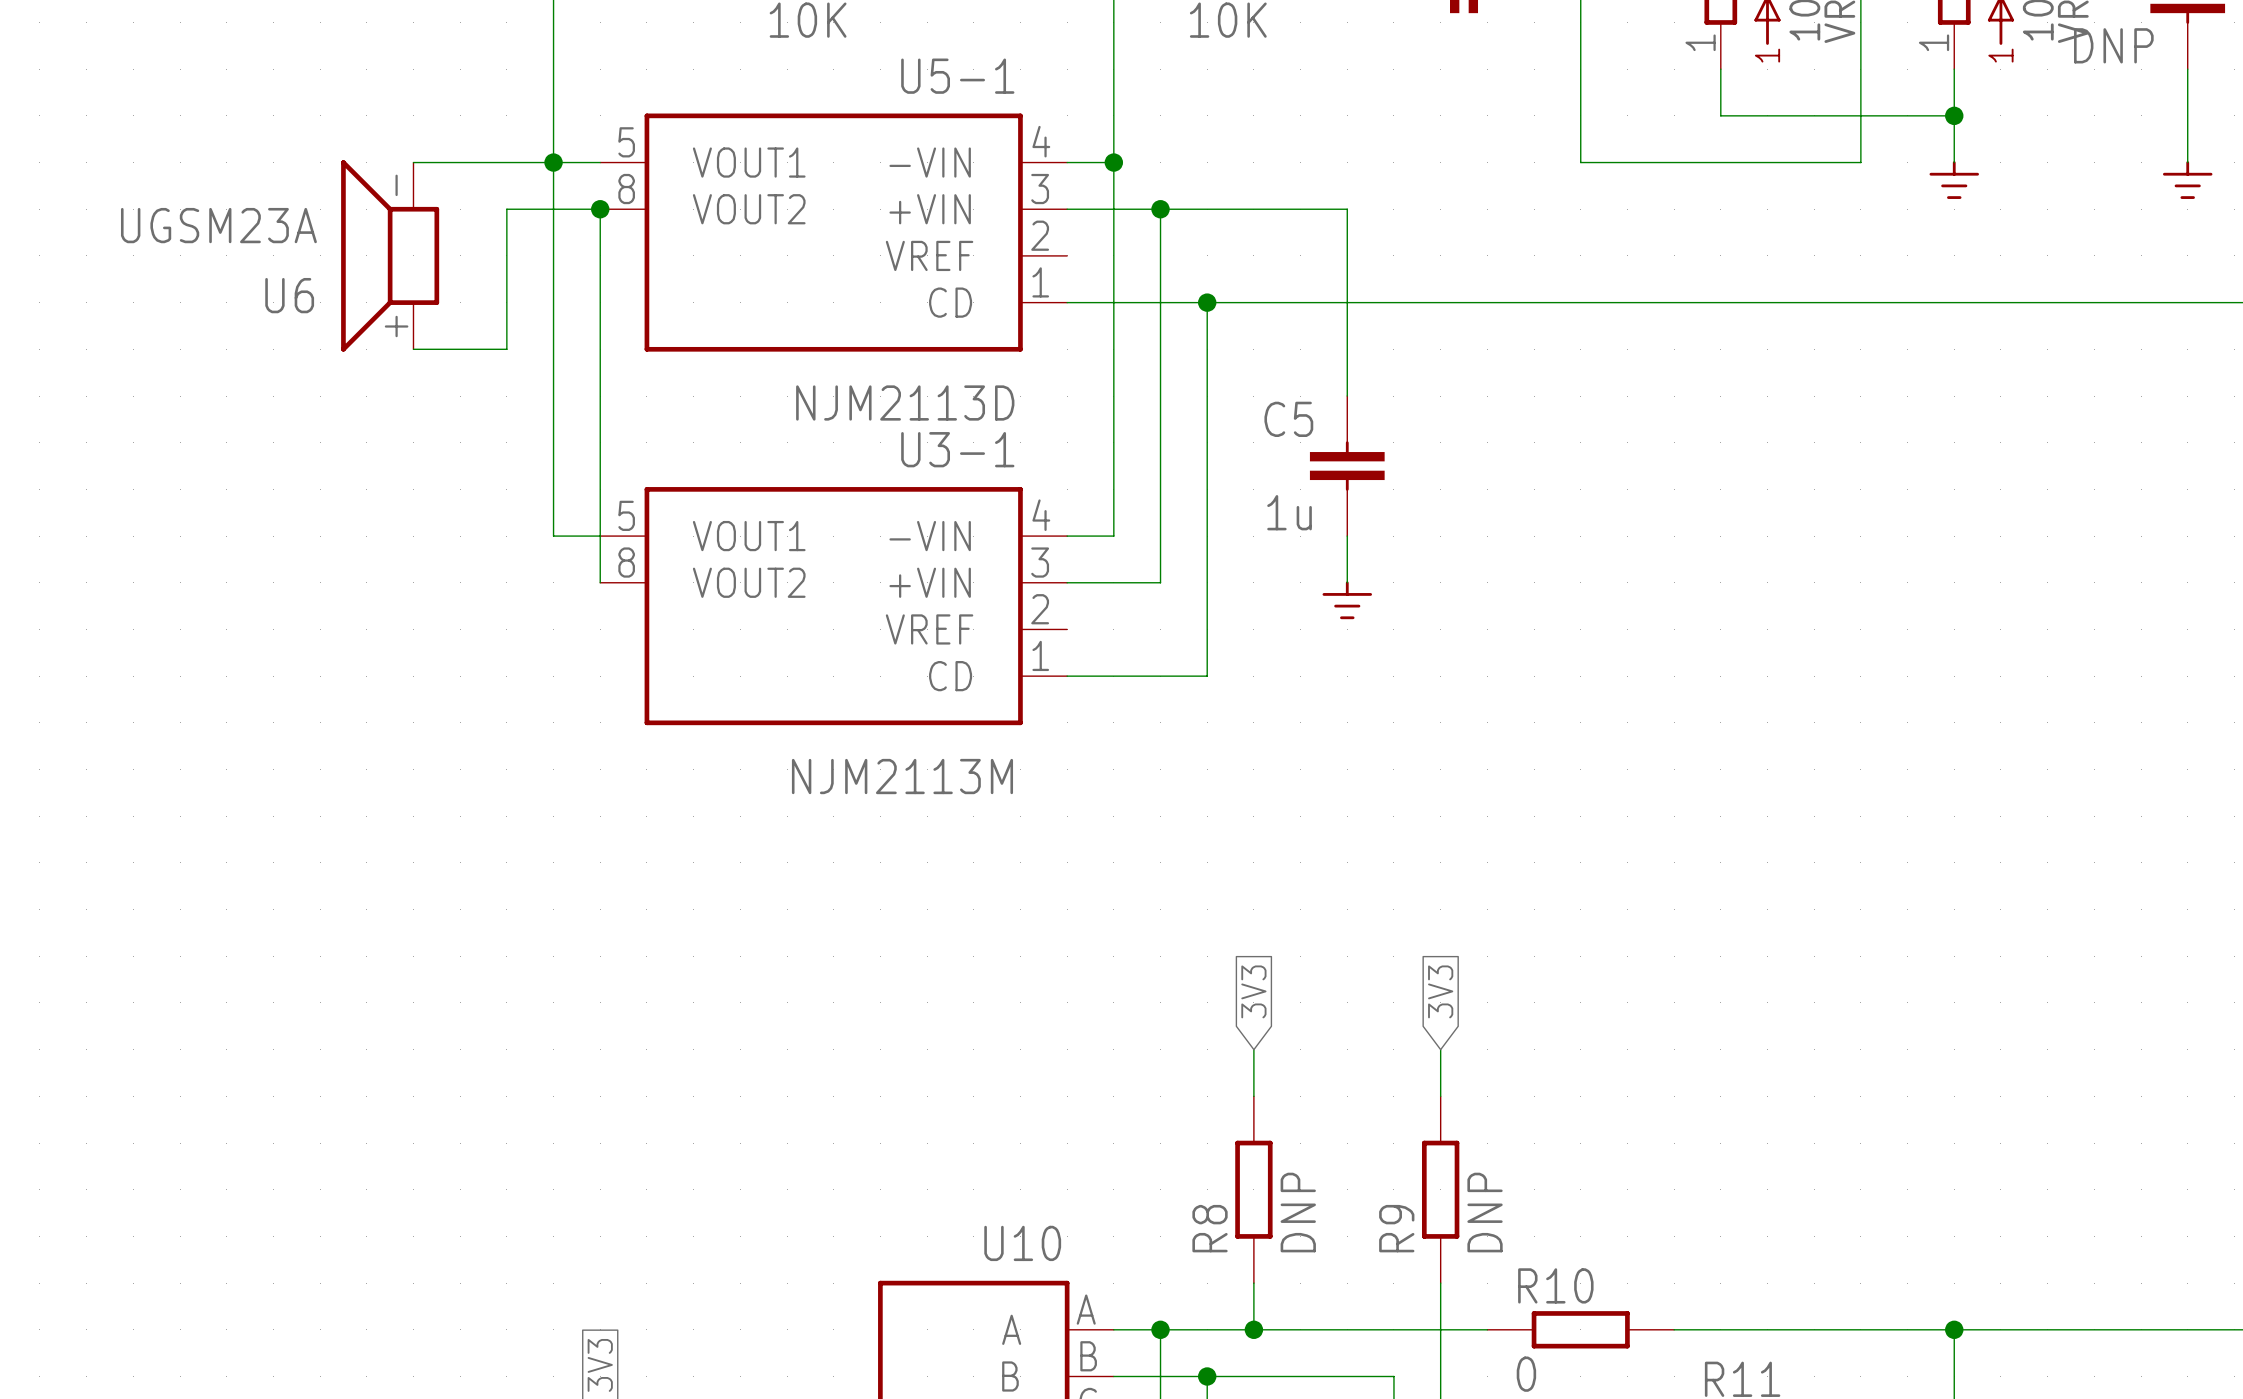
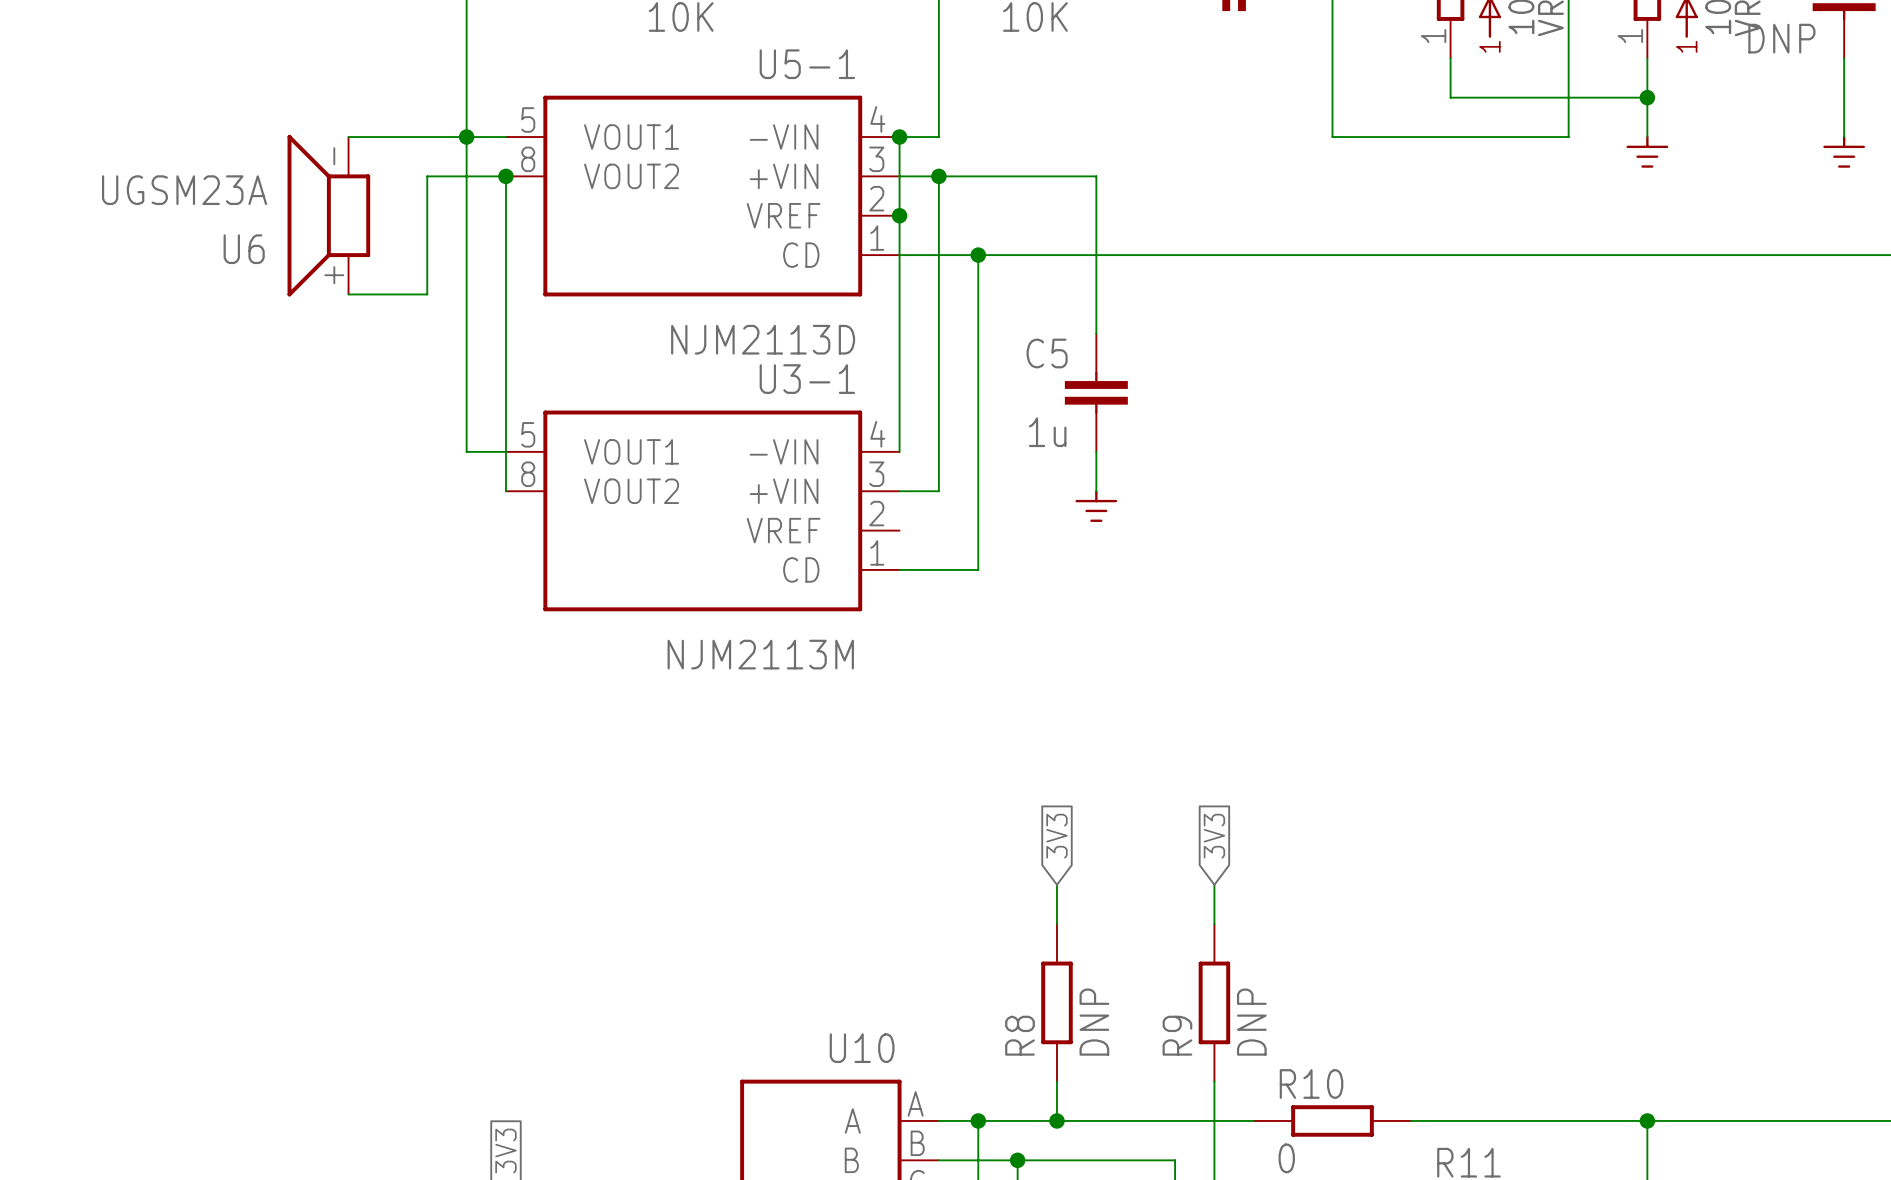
wire: none -> (899, 137) (899, 451)
junction: none -> (899, 137)
wire: (1113, 162) (1113, 209) -> none
junction: (1113, 162) -> none
junction: none -> (938, 176)
wire: (1160, 209) (1160, 302) -> none
junction: (1160, 209) -> none
wire: (1300, 209) (1347, 209) (1347, 396) -> (1096, 176) (1096, 333)
junction: none -> (899, 215)
junction: none -> (978, 255)
wire: (1207, 302) (1207, 676) (1160, 676) -> none
junction: (1207, 302) -> none
C5 position: (1347, 466) -> (1096, 392)
wire: (1067, 536) (1113, 536) -> (938, 491) (938, 451)
wire: (1347, 536) (1347, 582) -> (1096, 451) (1096, 491)
wire: (1113, 582) (1160, 582) -> (978, 569) (978, 491)
power symbol position: (1347, 600) -> (1096, 506)

